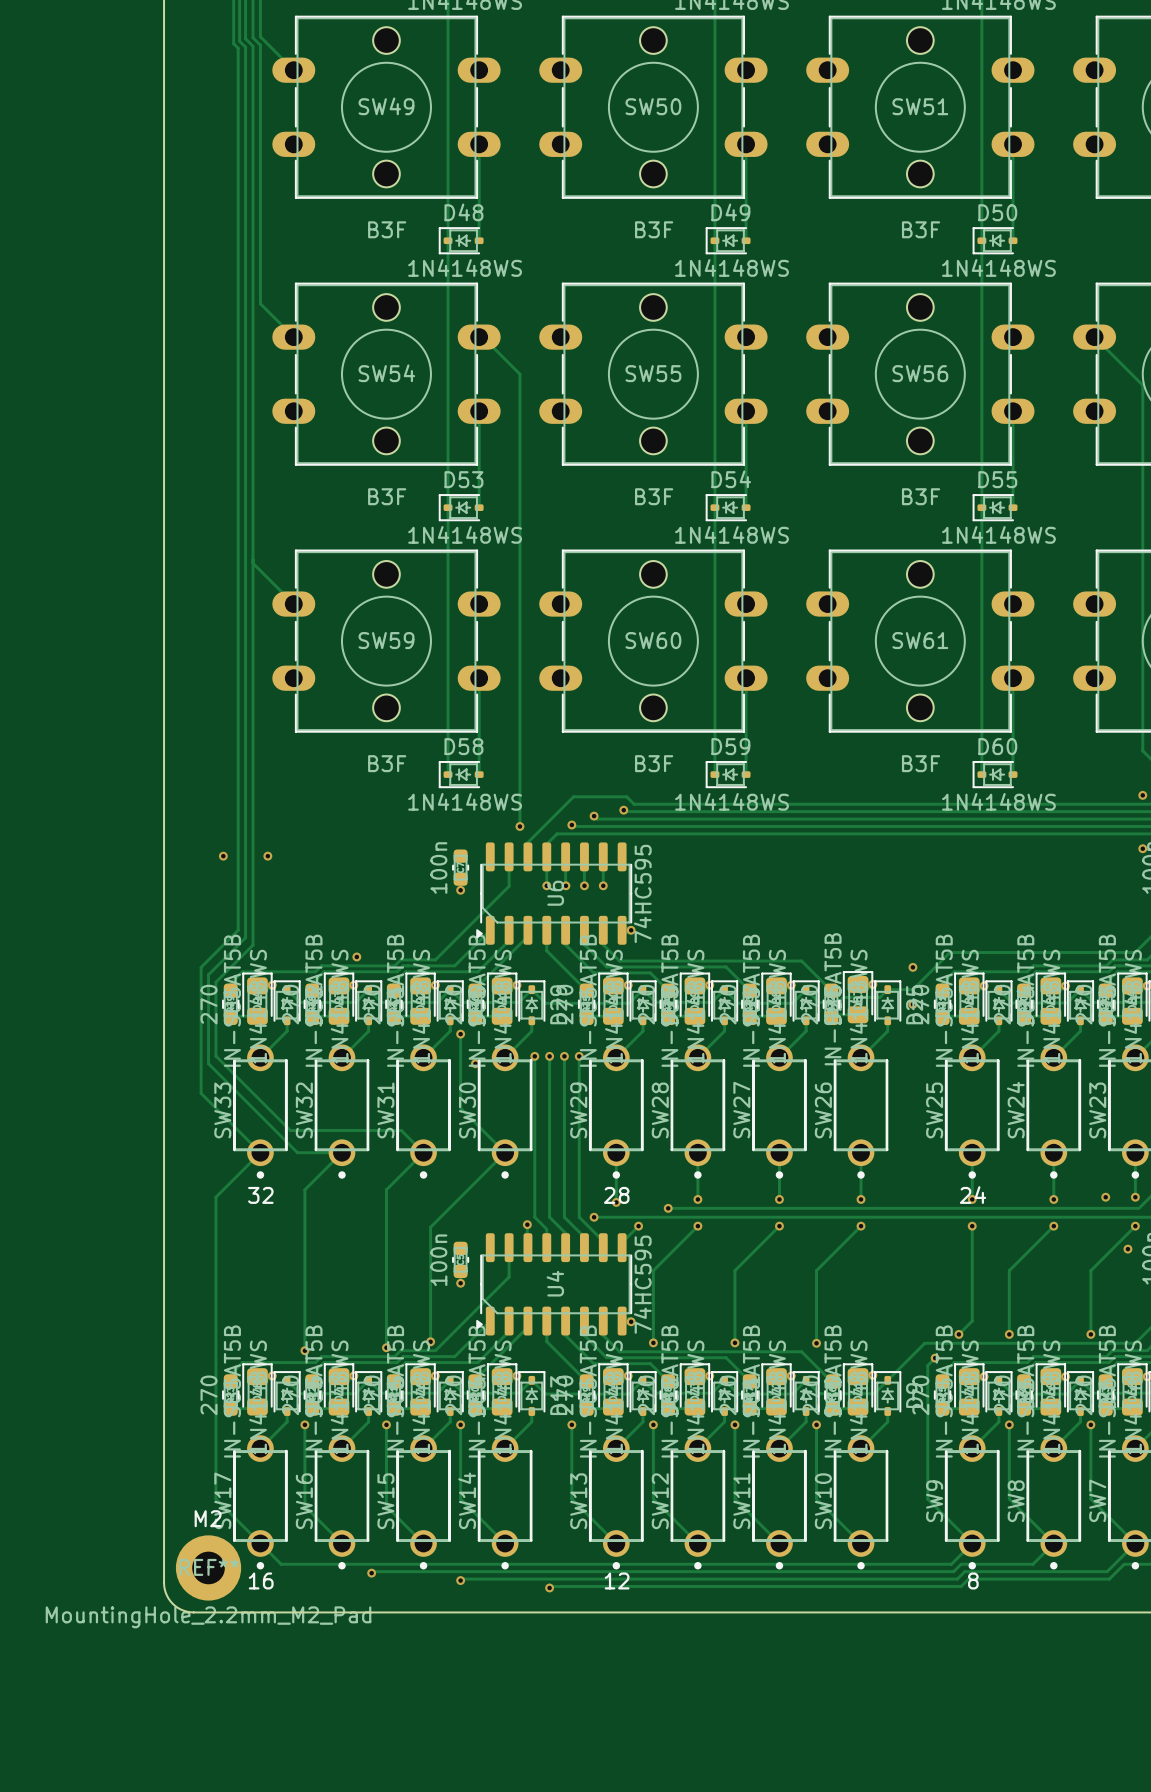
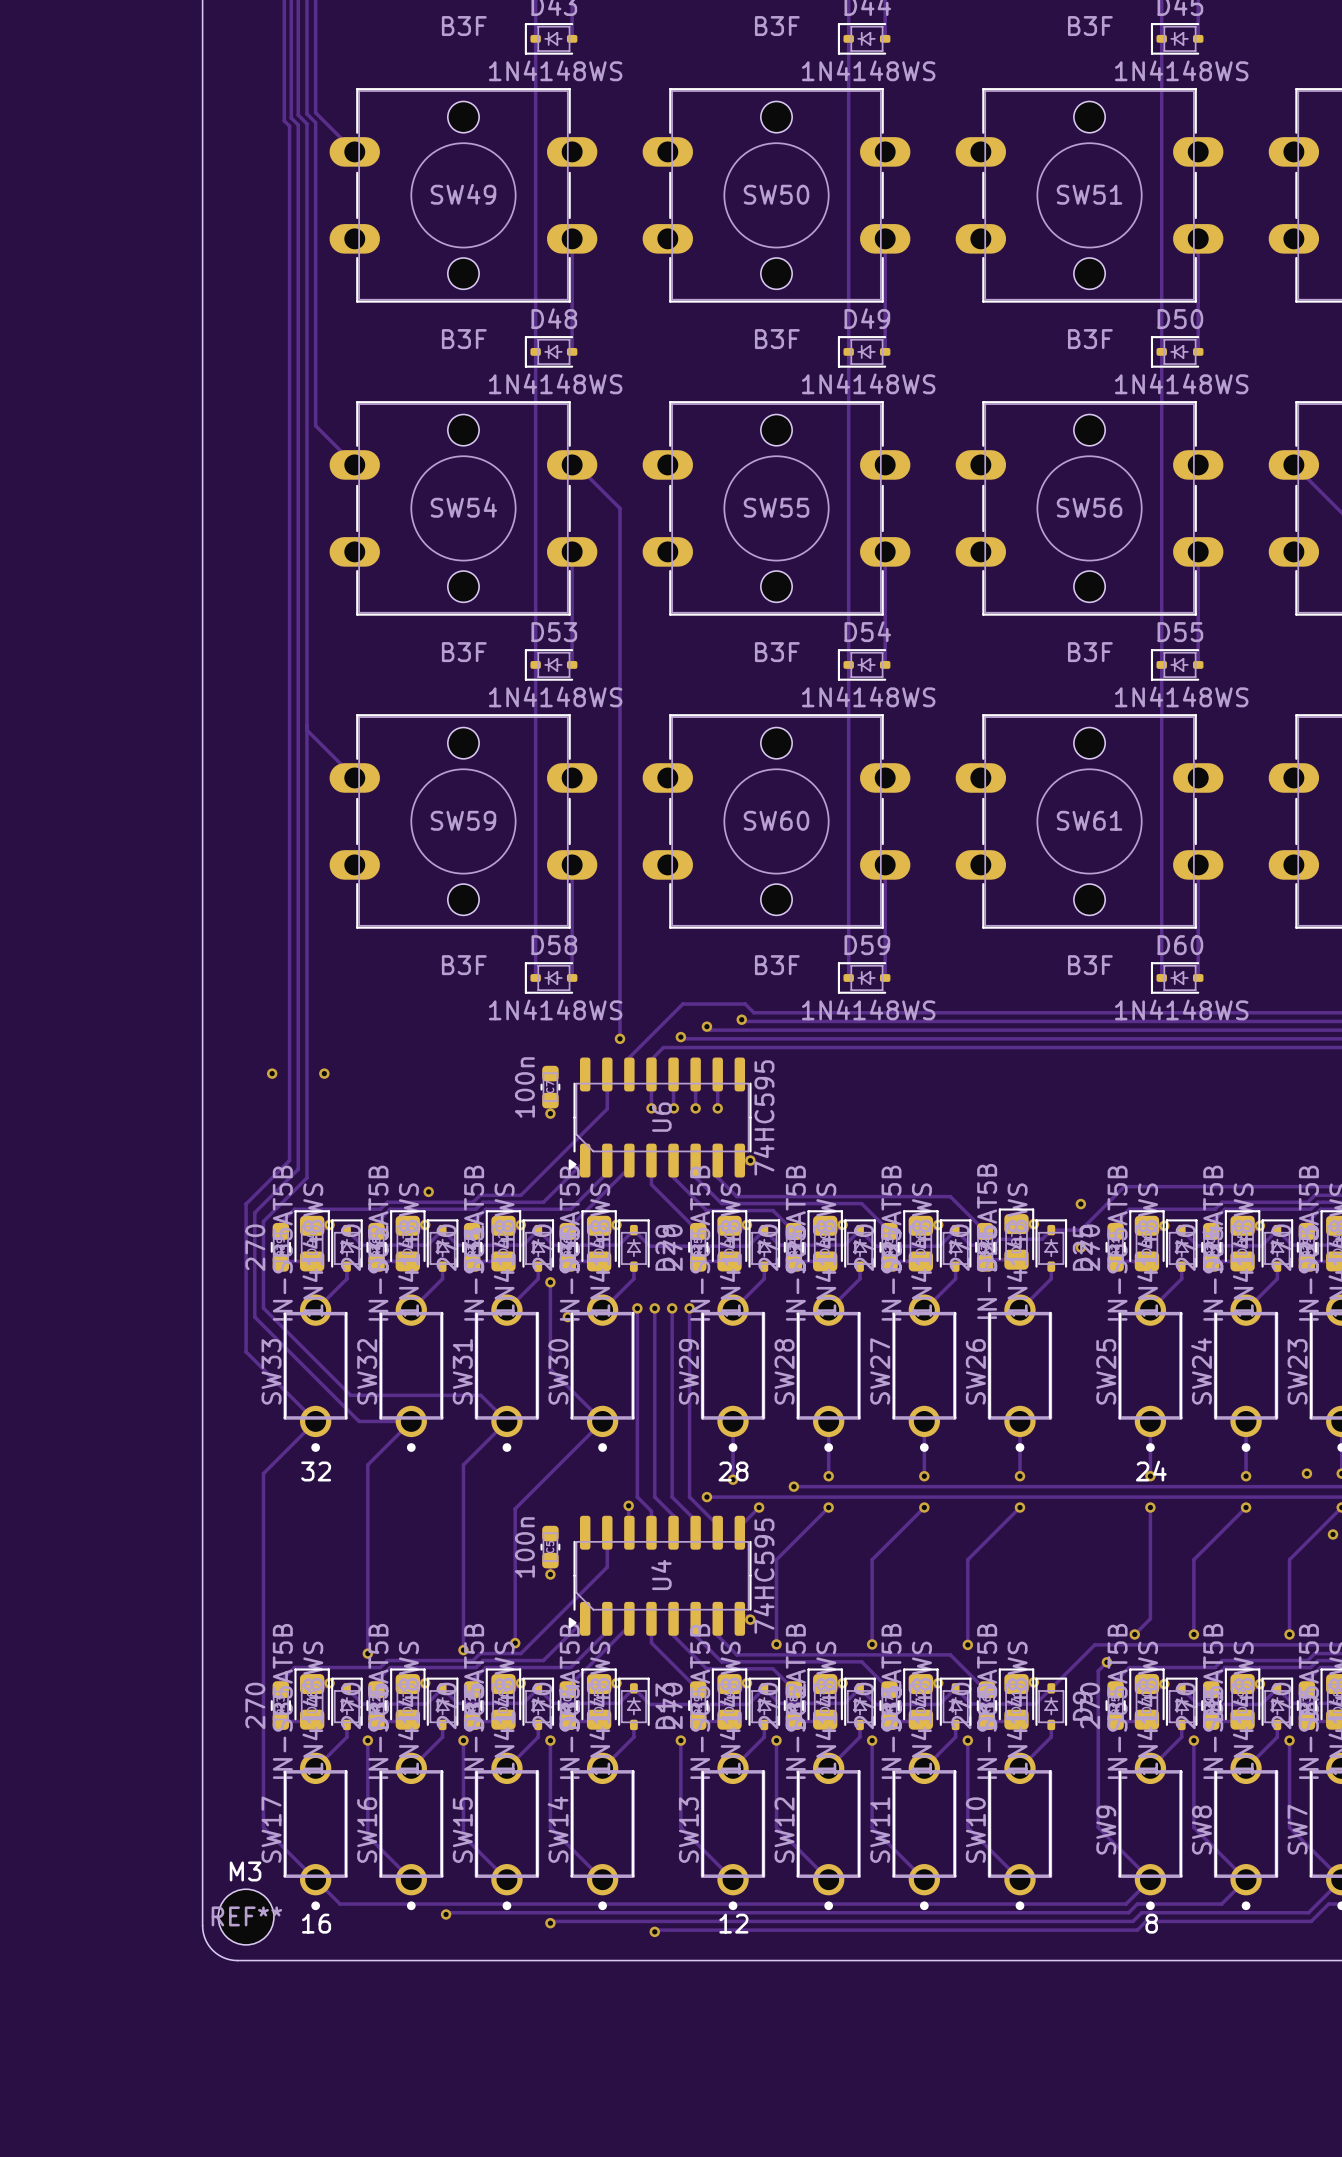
text: M2 (208, 1518) -> none
REF** footprint: [175, 1535, 242, 1601] -> [218, 1889, 274, 1945]
text: none -> M3 (245, 1871)
REF** value: MountingHole_2.2mm_M2_Pad (208, 1617) -> none

